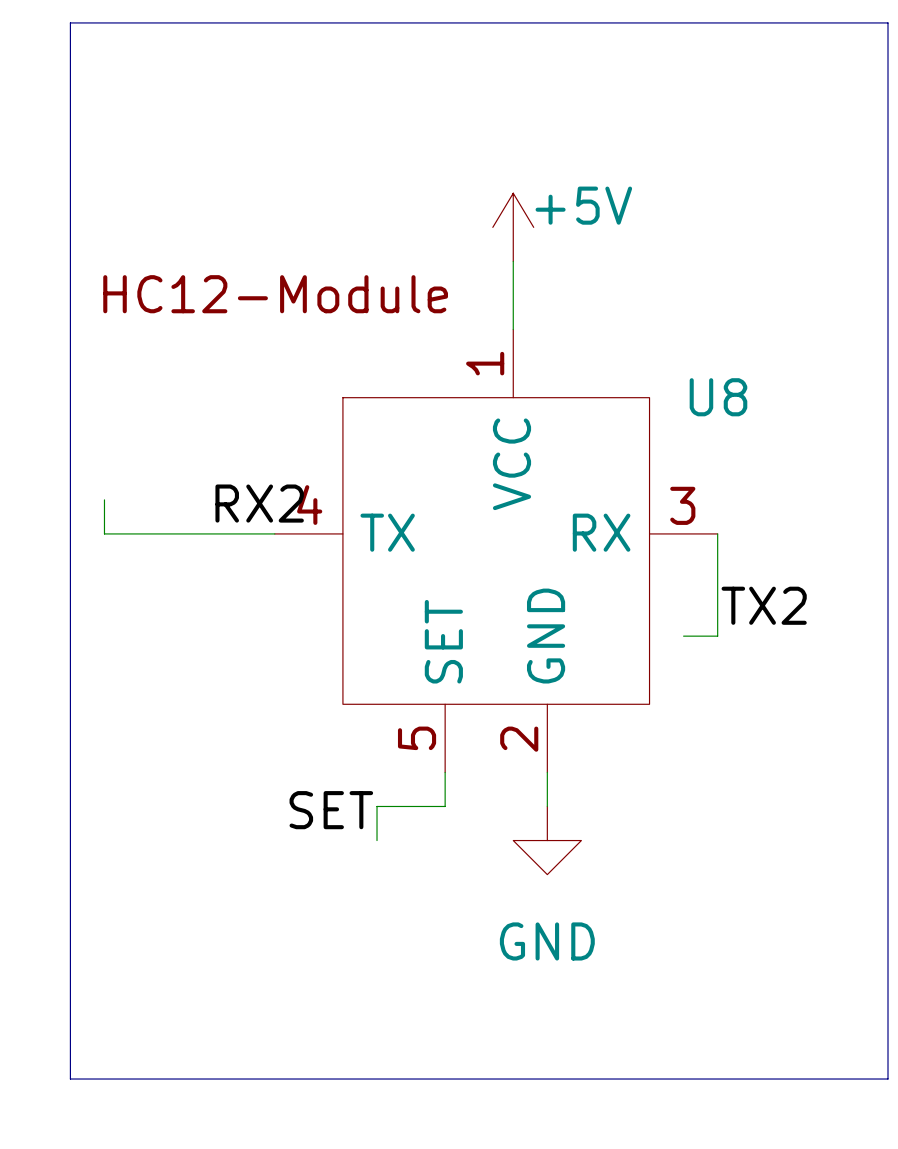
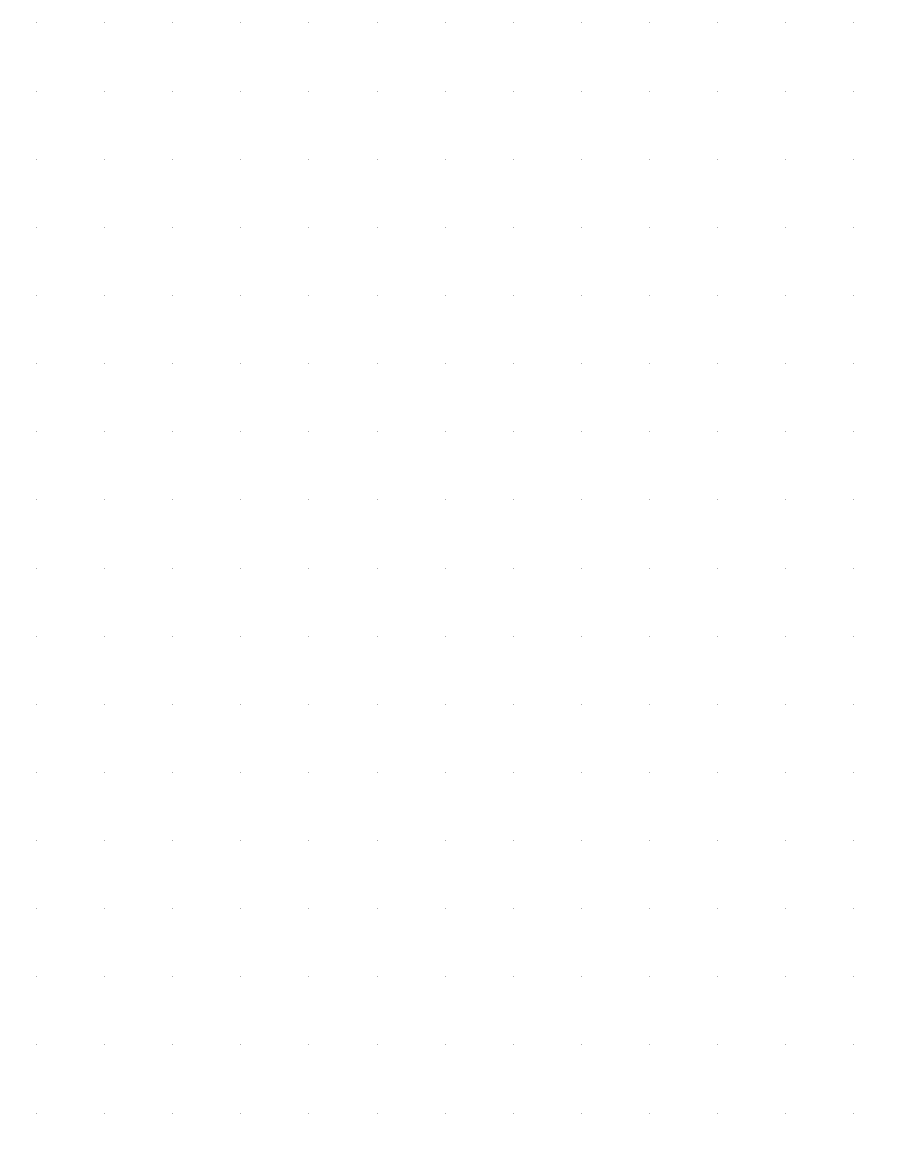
line: (70, 22) (70, 1079) (888, 1079) (888, 22) (70, 22) -> none
power symbol: +5V (513, 227) -> none
wire: (513, 261) (513, 329) -> none
wire: (104, 499) (104, 533) (274, 533) -> none
label: RX2 (259, 503) -> none
wire: (717, 533) (717, 636) (683, 636) -> none
U8: (496, 550) -> none
label: TX2 (764, 605) -> none
wire: (445, 772) (445, 806) (377, 806) (377, 840) -> none
wire: (547, 772) (547, 806) -> none
label: SET (331, 810) -> none
power symbol: GND (547, 840) -> none

